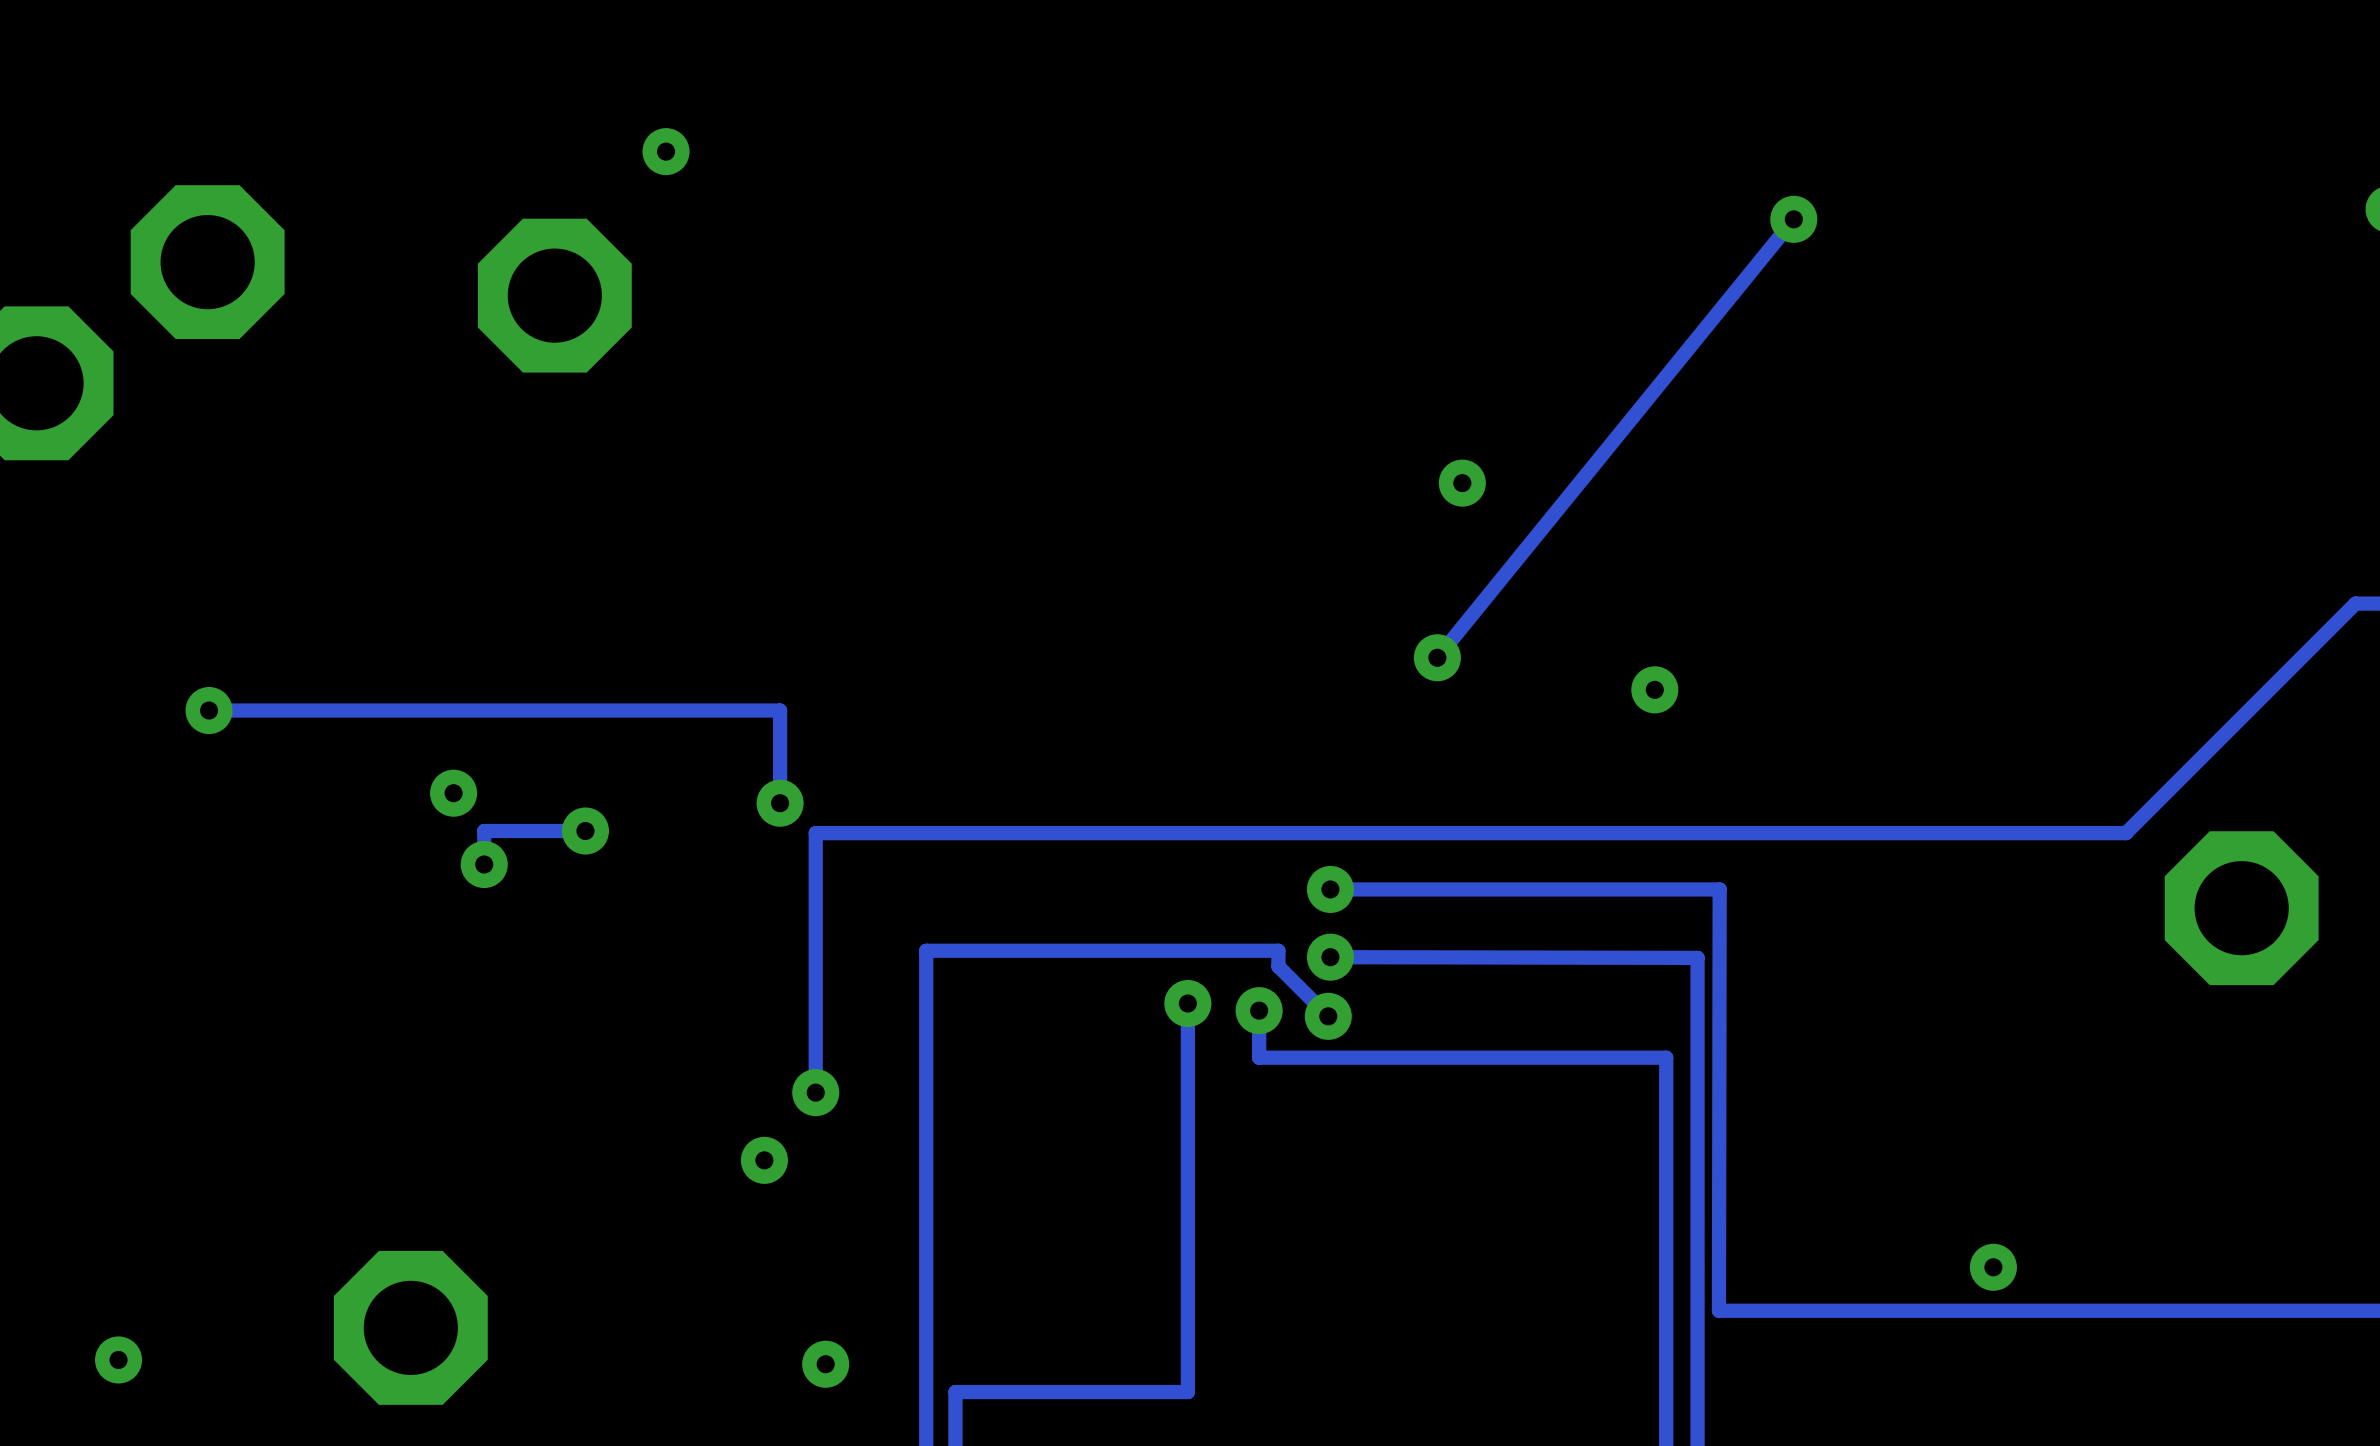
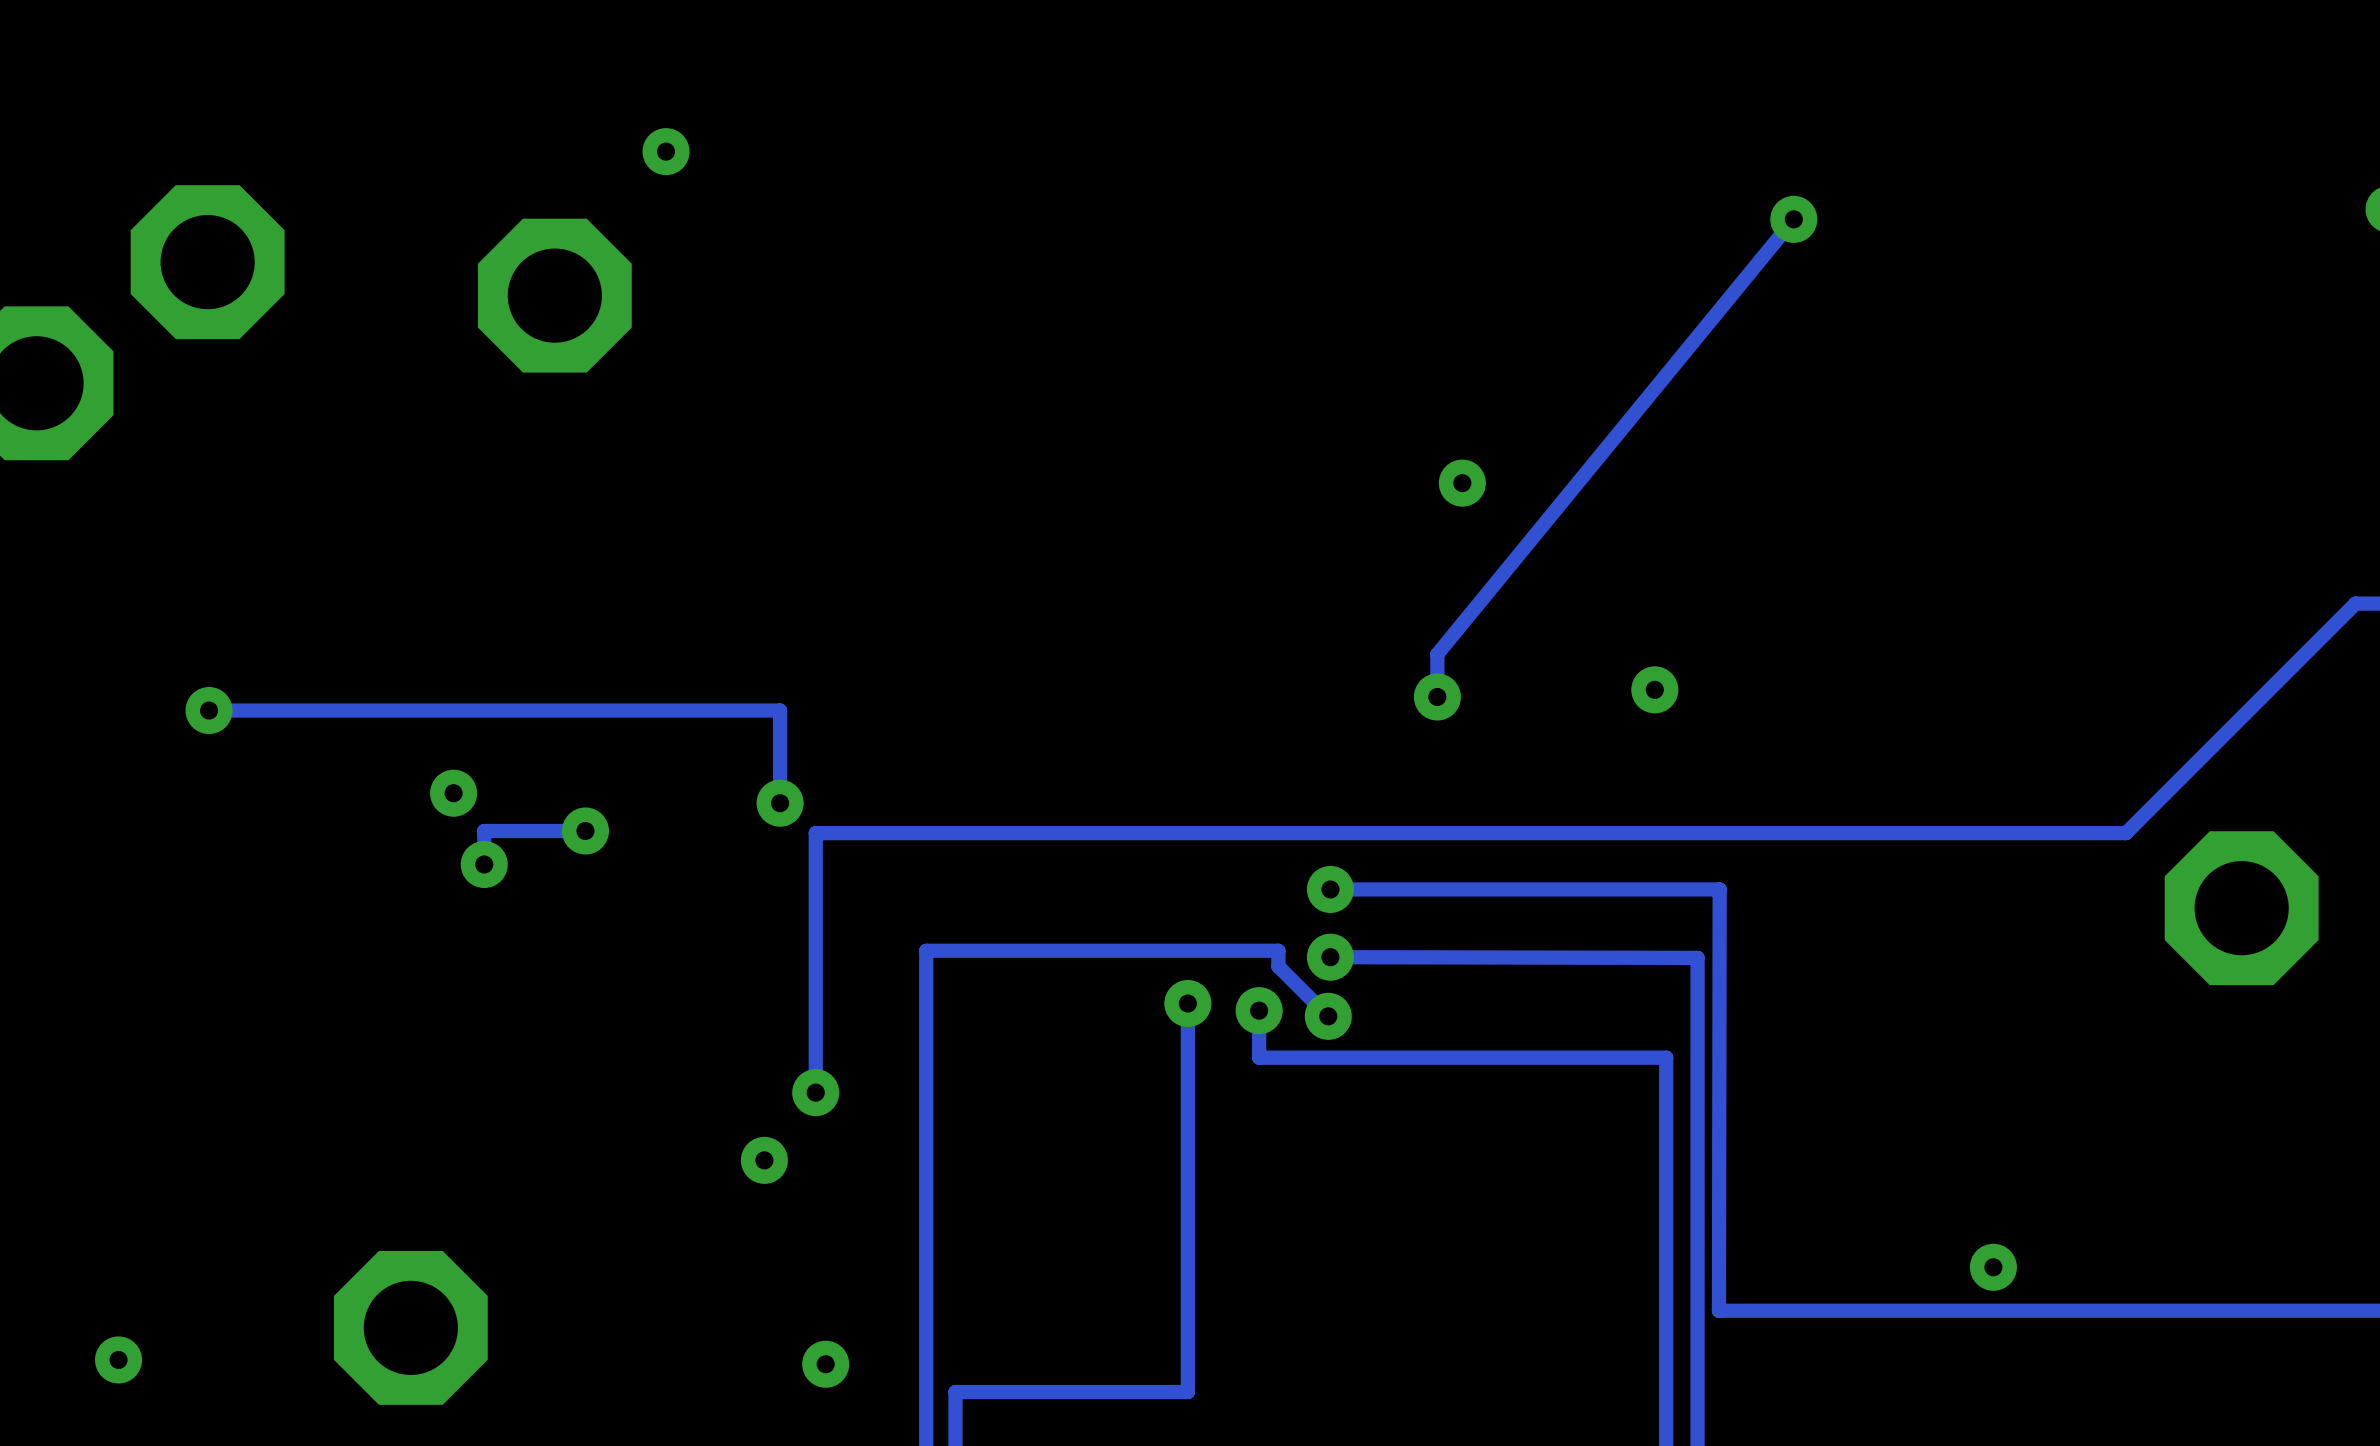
track: (1793, 219) (1437, 657) -> (1793, 219) (1437, 654) (1437, 696)
via position: (1437, 657) -> (1437, 696)

